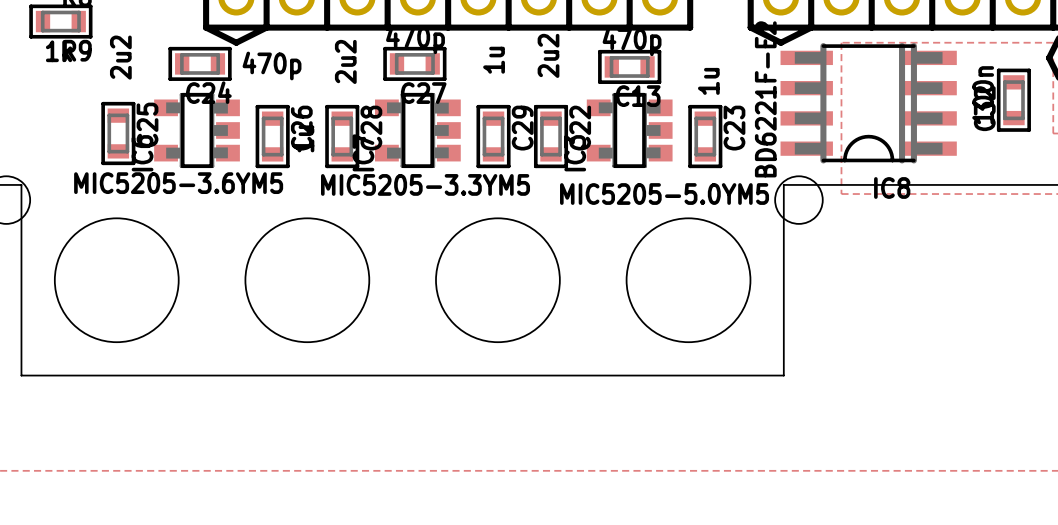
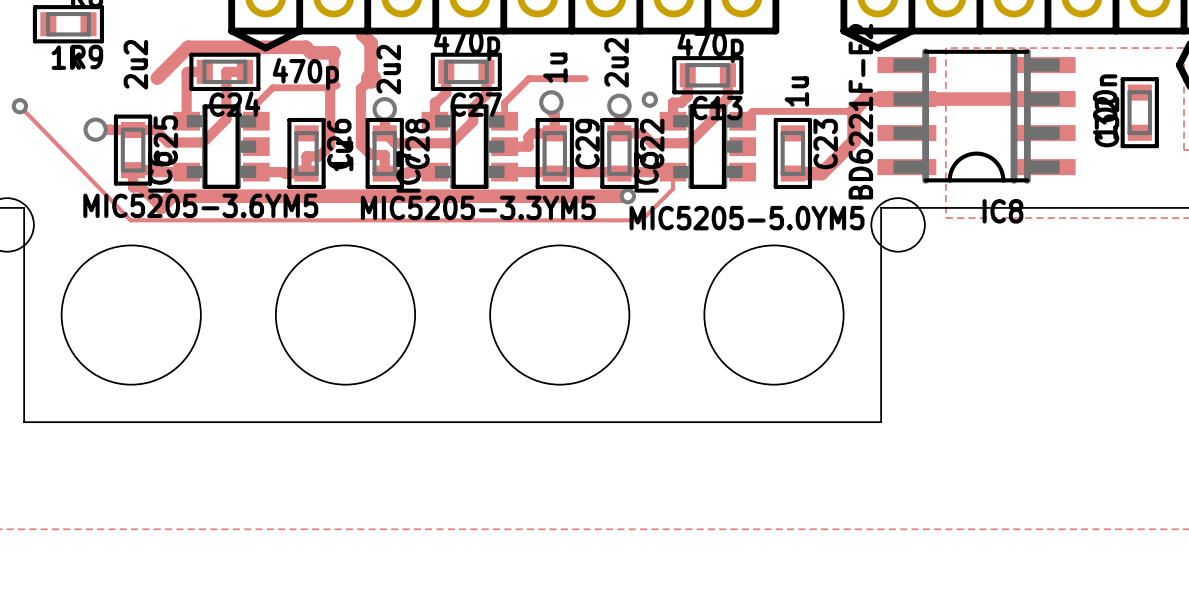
track: none -> (362, 34) (371, 43) (371, 78) (360, 88) (360, 145) (370, 154) (384, 154) (384, 173) (434, 172)
track: none -> (204, 71) (186, 72) (186, 121)
track: none -> (244, 71) (226, 71) (226, 119) (203, 142) (168, 142) (155, 129) (110, 129)
track: none -> (446, 71) (446, 93) (434, 102) (434, 121)
track: none -> (486, 71) (486, 94) (473, 107) (473, 121) (451, 143) (395, 143) (385, 133) (385, 109)
track: none -> (687, 75) (687, 96) (681, 102) (673, 102) (673, 121)
track: none -> (727, 75) (727, 97) (714, 111) (714, 117) (688, 143) (651, 143) (642, 133) (619, 133) (619, 105)
track: none -> (157, 78) (188, 47) (305, 47) (311, 52) (333, 52) (333, 85)
track: none -> (585, 78) (528, 78) (504, 103) (504, 121)
track: none -> (337, 85) (330, 85) (330, 145) (319, 156) (306, 156) (306, 173) (256, 172)
track: none -> (330, 87) (272, 87) (256, 104) (256, 121)
via: none -> (649, 99)
track: none -> (1046, 99) (865, 99) (852, 111)
track: none -> (551, 102) (551, 111) (554, 114) (554, 133) (532, 133) (528, 137) (528, 146) (504, 146)
via: none -> (551, 102)
track: none -> (19, 106) (130, 220) (641, 220) (673, 188) (673, 172) (504, 172)
via: none -> (19, 106)
via: none -> (619, 105)
via: none -> (384, 109)
track: none -> (852, 111) (854, 141) (821, 173) (792, 173) (796, 173)
track: none -> (852, 111) (752, 111) (742, 121)
via: none -> (95, 129)
track: none -> (186, 172) (133, 170) (133, 187) (141, 187) (160, 207) (171, 196) (627, 196)
via: none -> (627, 196)

